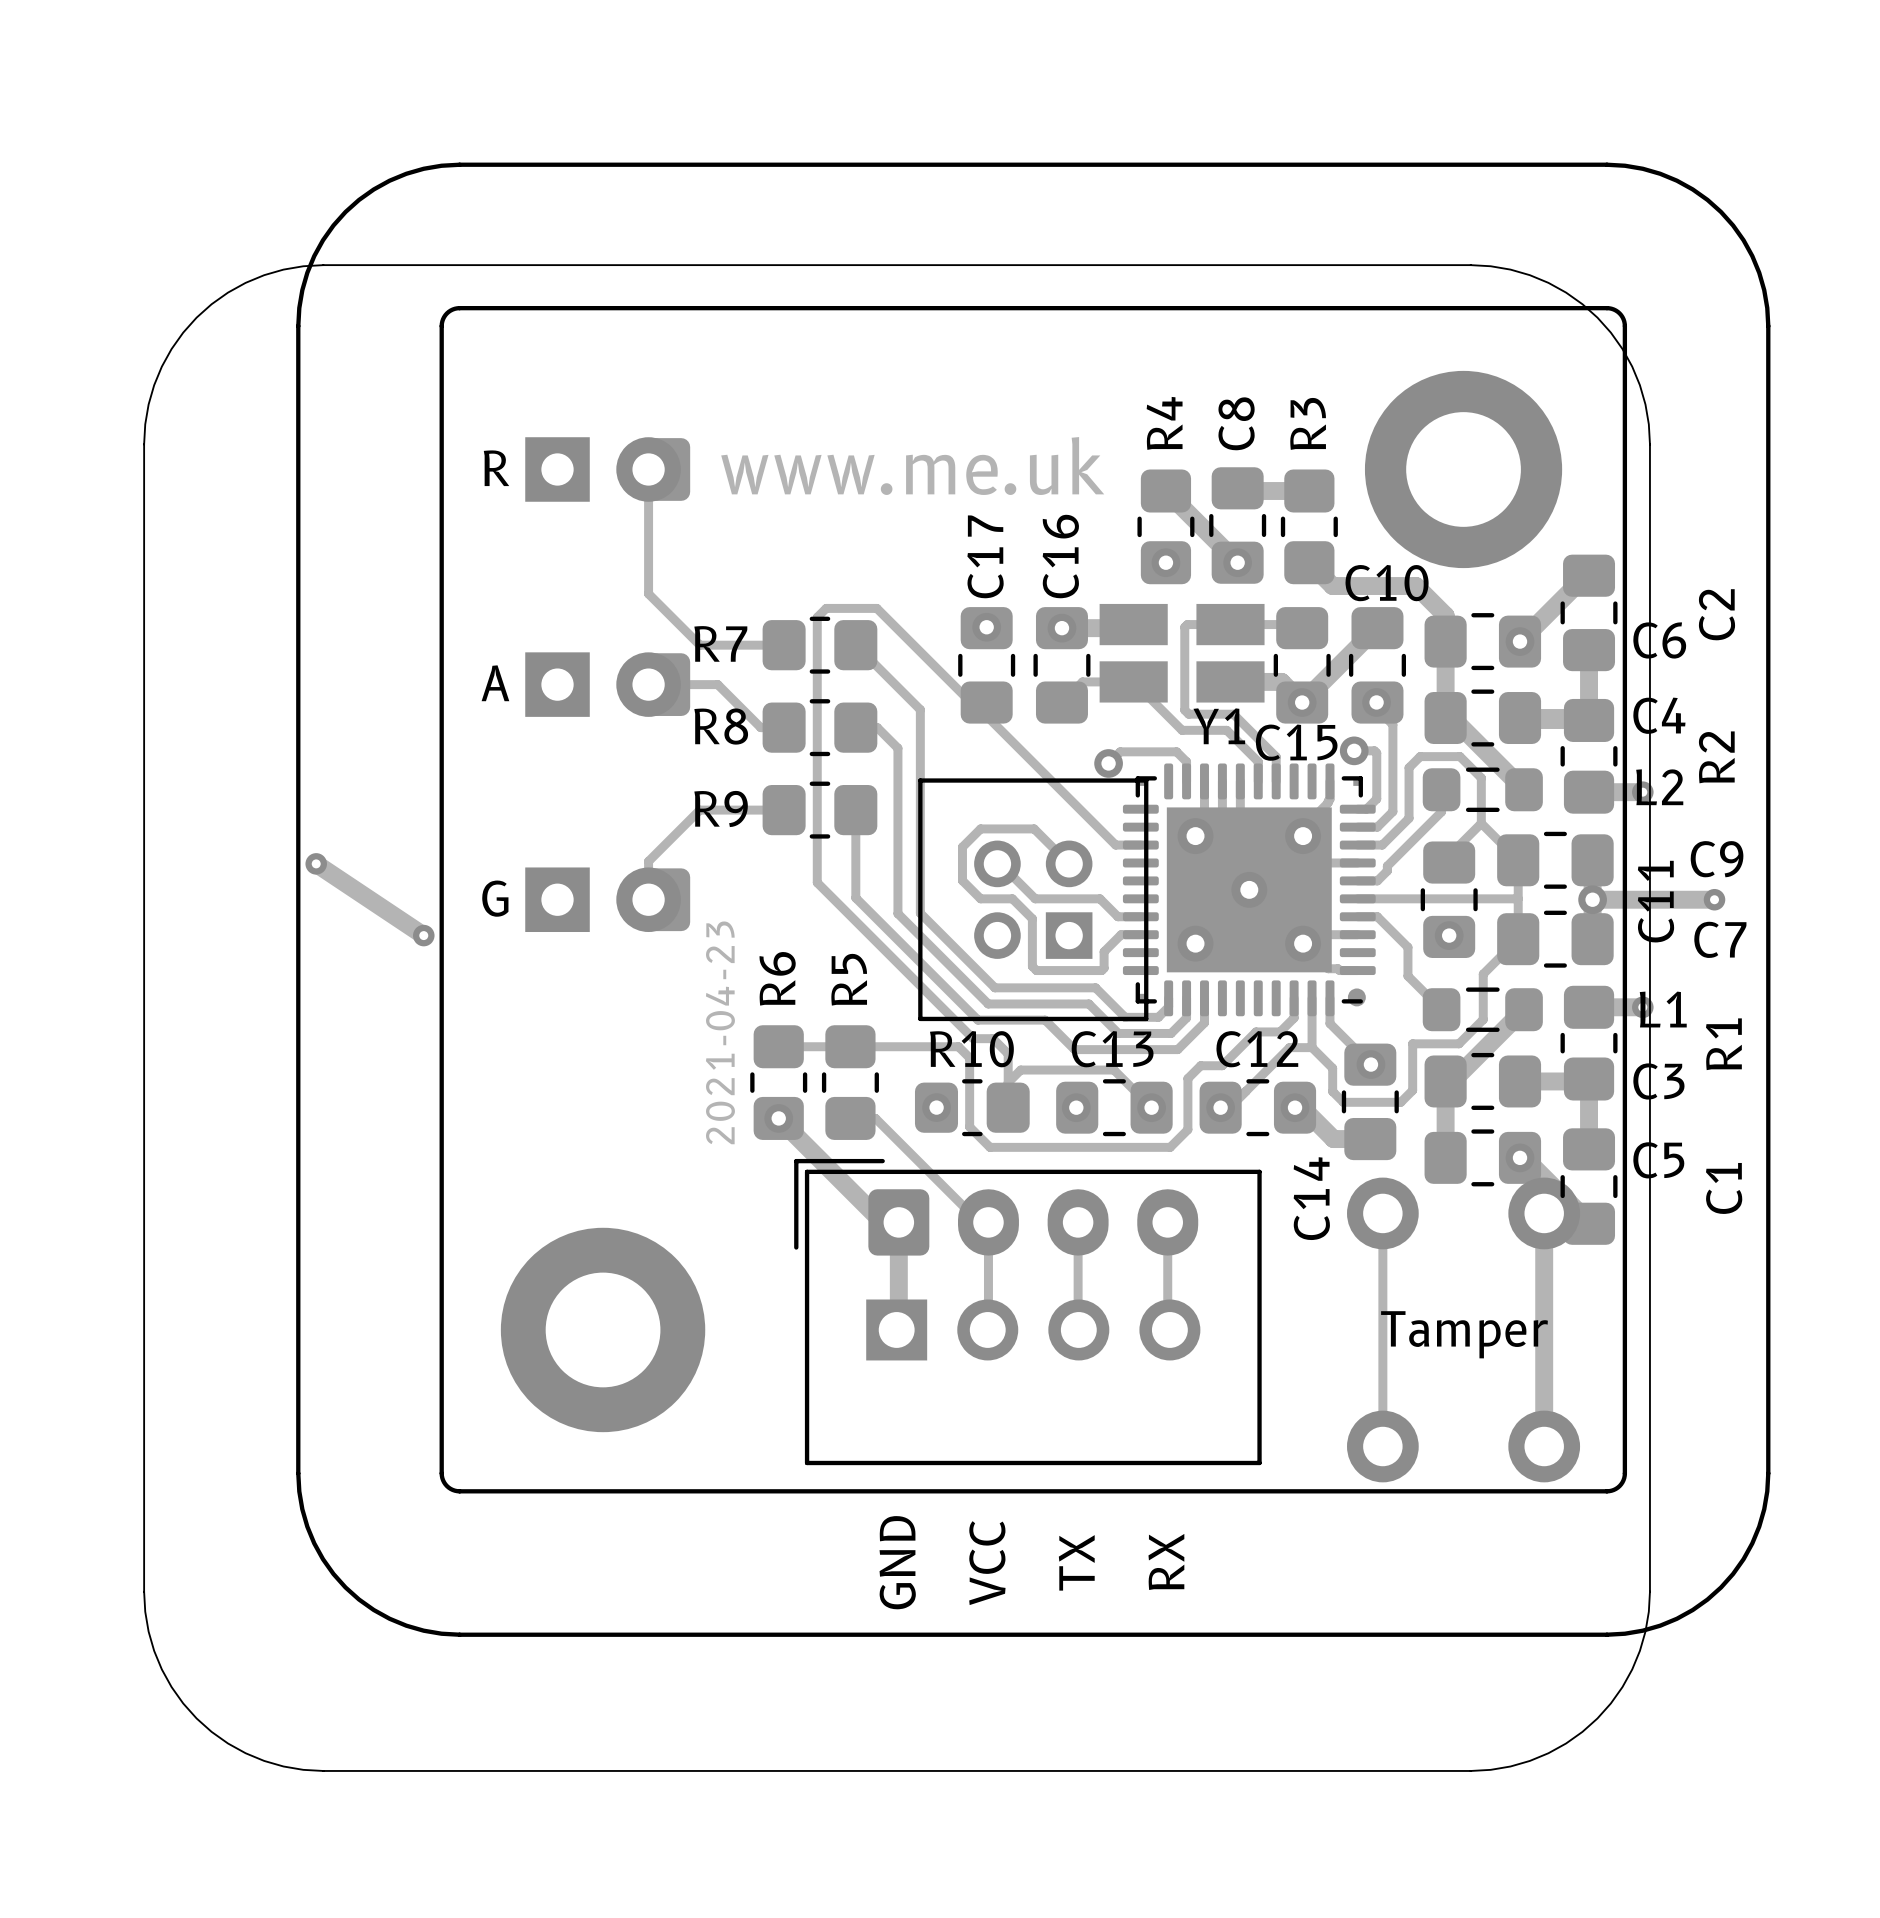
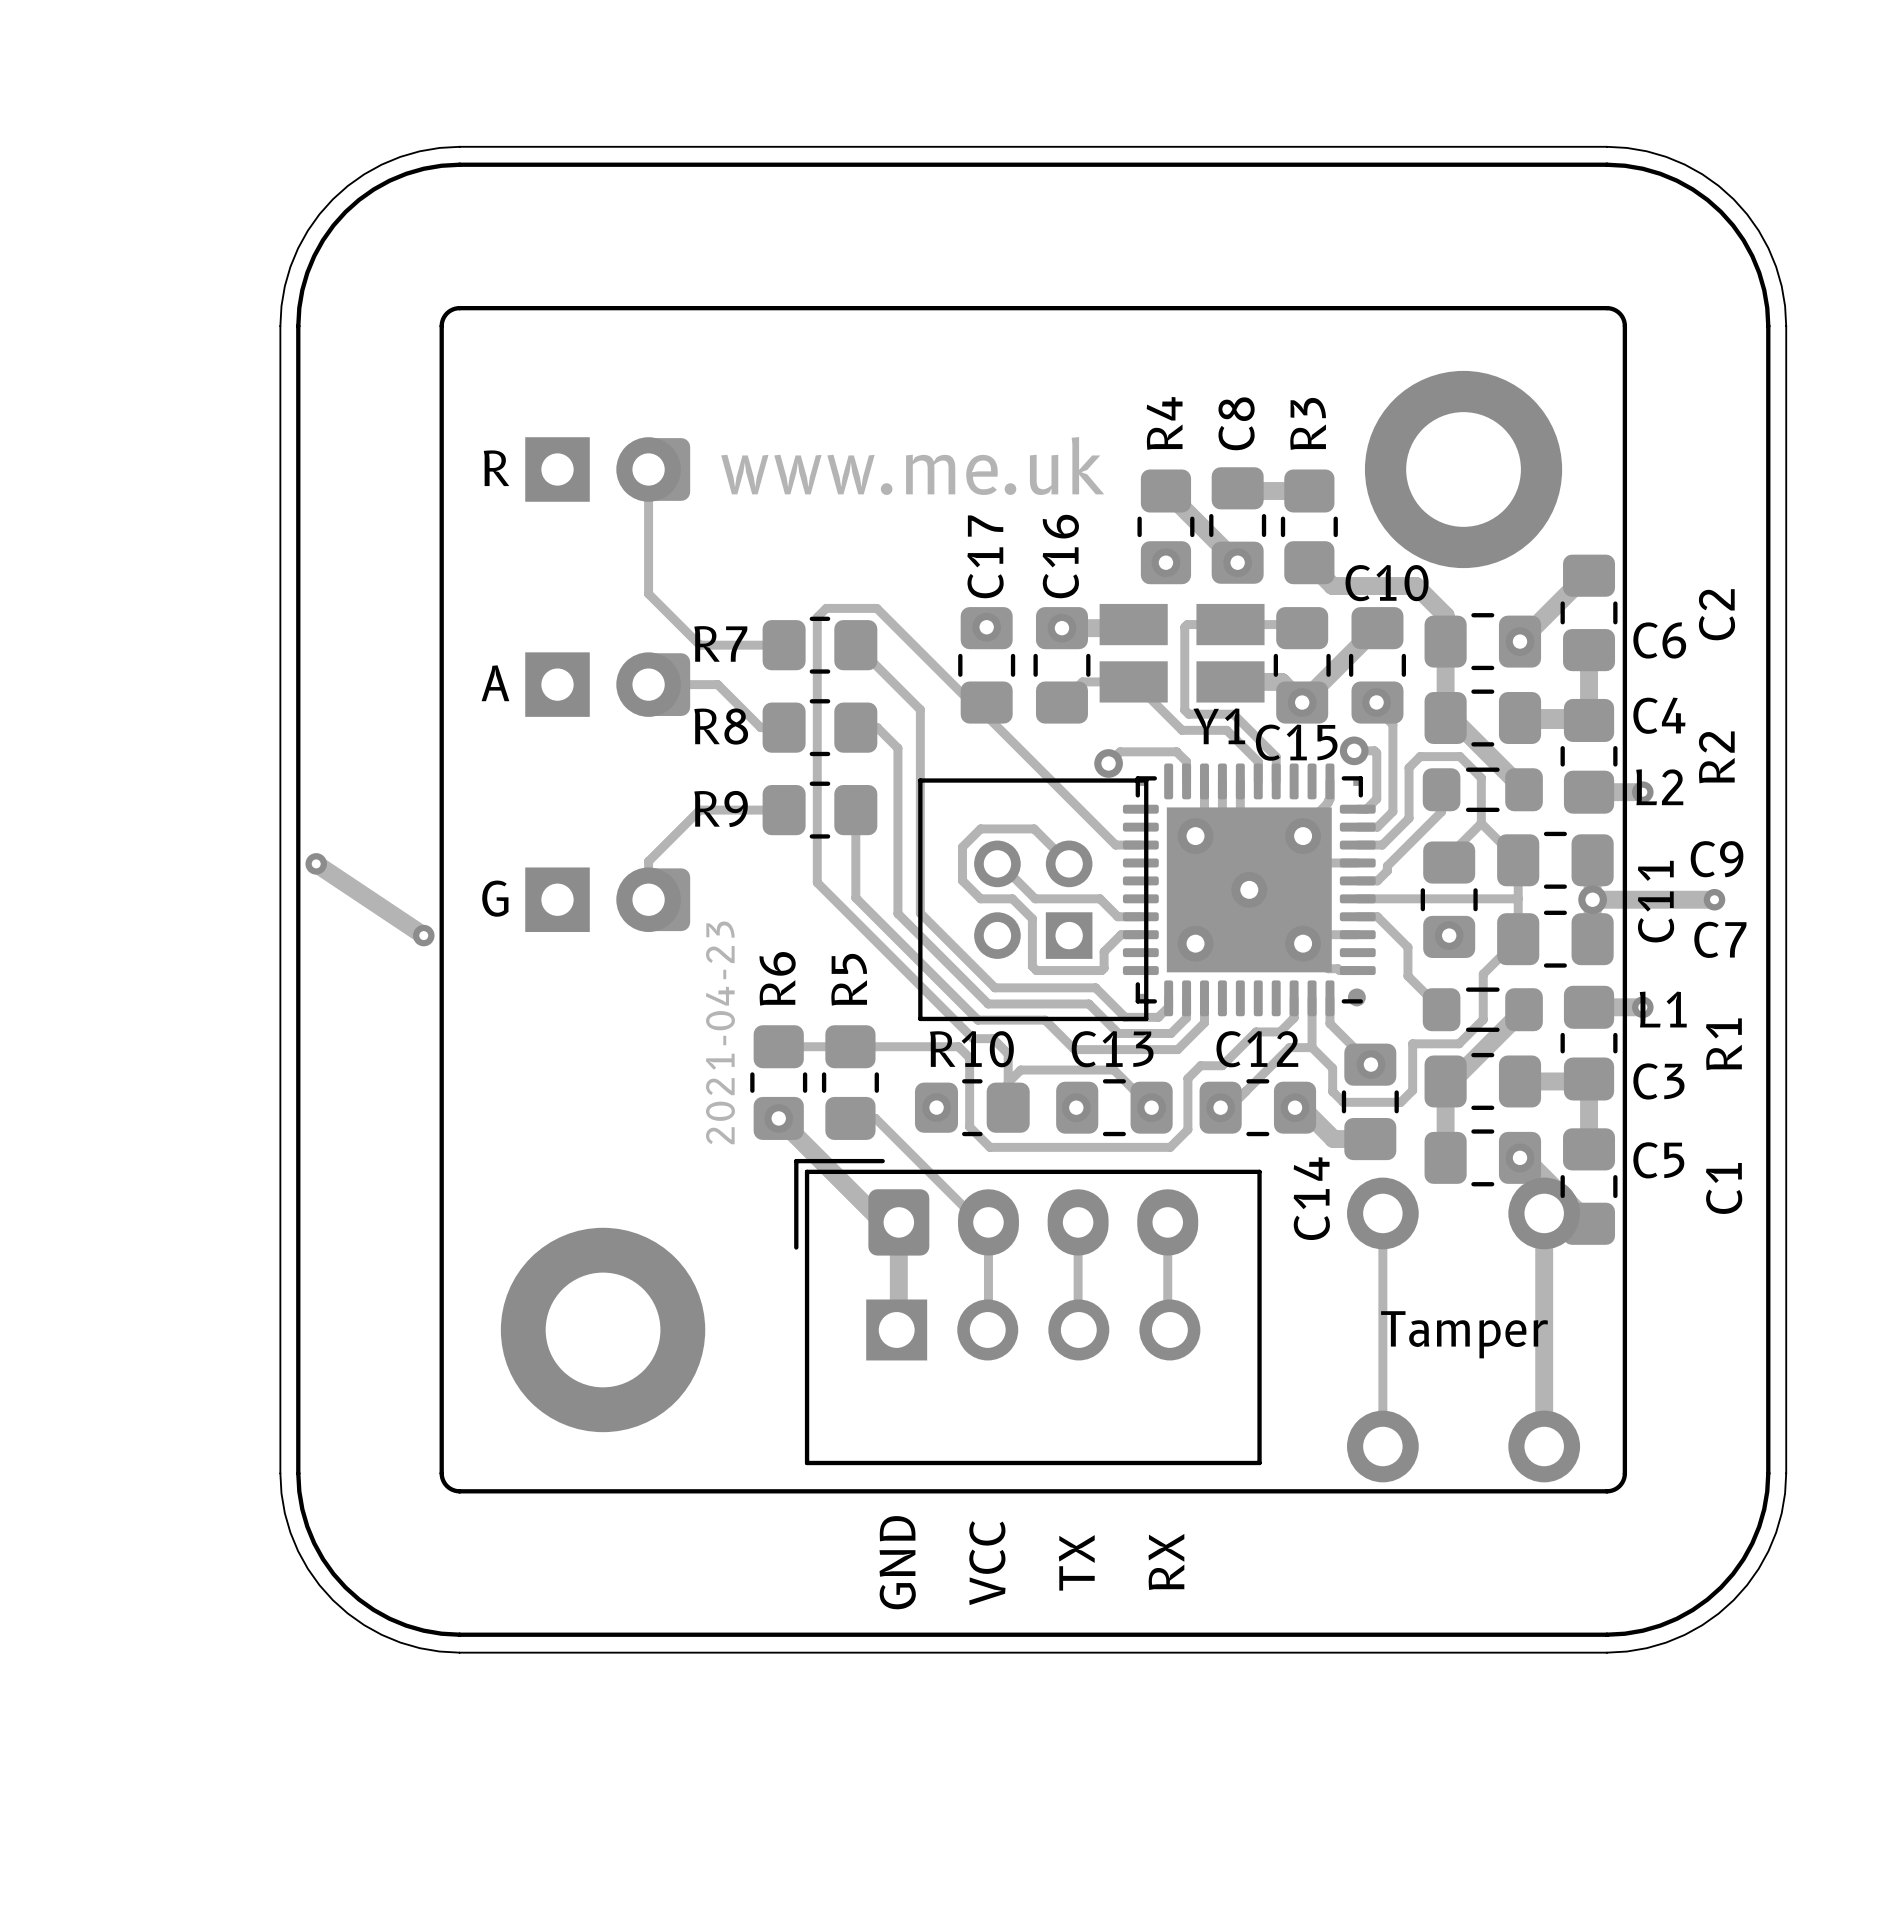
board edge: (323, 265) (1470, 265) (1510, 269) (1548, 282) (1582, 304) (1610, 332) (1622, 349) (1639, 385) (1648, 424) (1649, 444) (1649, 1591) (1645, 1631) (1632, 1669) (1610, 1703) (1582, 1731) (1548, 1753) (1529, 1760) (1490, 1769) (1470, 1770) (323, 1770) (283, 1766) (245, 1753) (211, 1731) (183, 1703) (161, 1669) (154, 1650) (148, 1631) (144, 1591) (145, 424) (148, 404) (161, 366) (183, 332) (196, 317) (228, 292) (245, 282) (283, 269) (323, 265) -> (459, 146) (1606, 146) (1646, 151) (1684, 164) (1718, 185) (1747, 214) (1758, 230) (1776, 266) (1785, 306) (1786, 326) (1786, 1473) (1781, 1513) (1768, 1551) (1747, 1585) (1718, 1613) (1684, 1634) (1666, 1642) (1646, 1648) (1606, 1652) (459, 1652) (419, 1648) (381, 1634) (347, 1613) (319, 1585) (298, 1551) (290, 1532) (284, 1513) (280, 1473) (281, 306) (284, 286) (298, 248) (319, 214) (332, 199) (347, 185) (381, 164) (419, 151) (459, 146)

